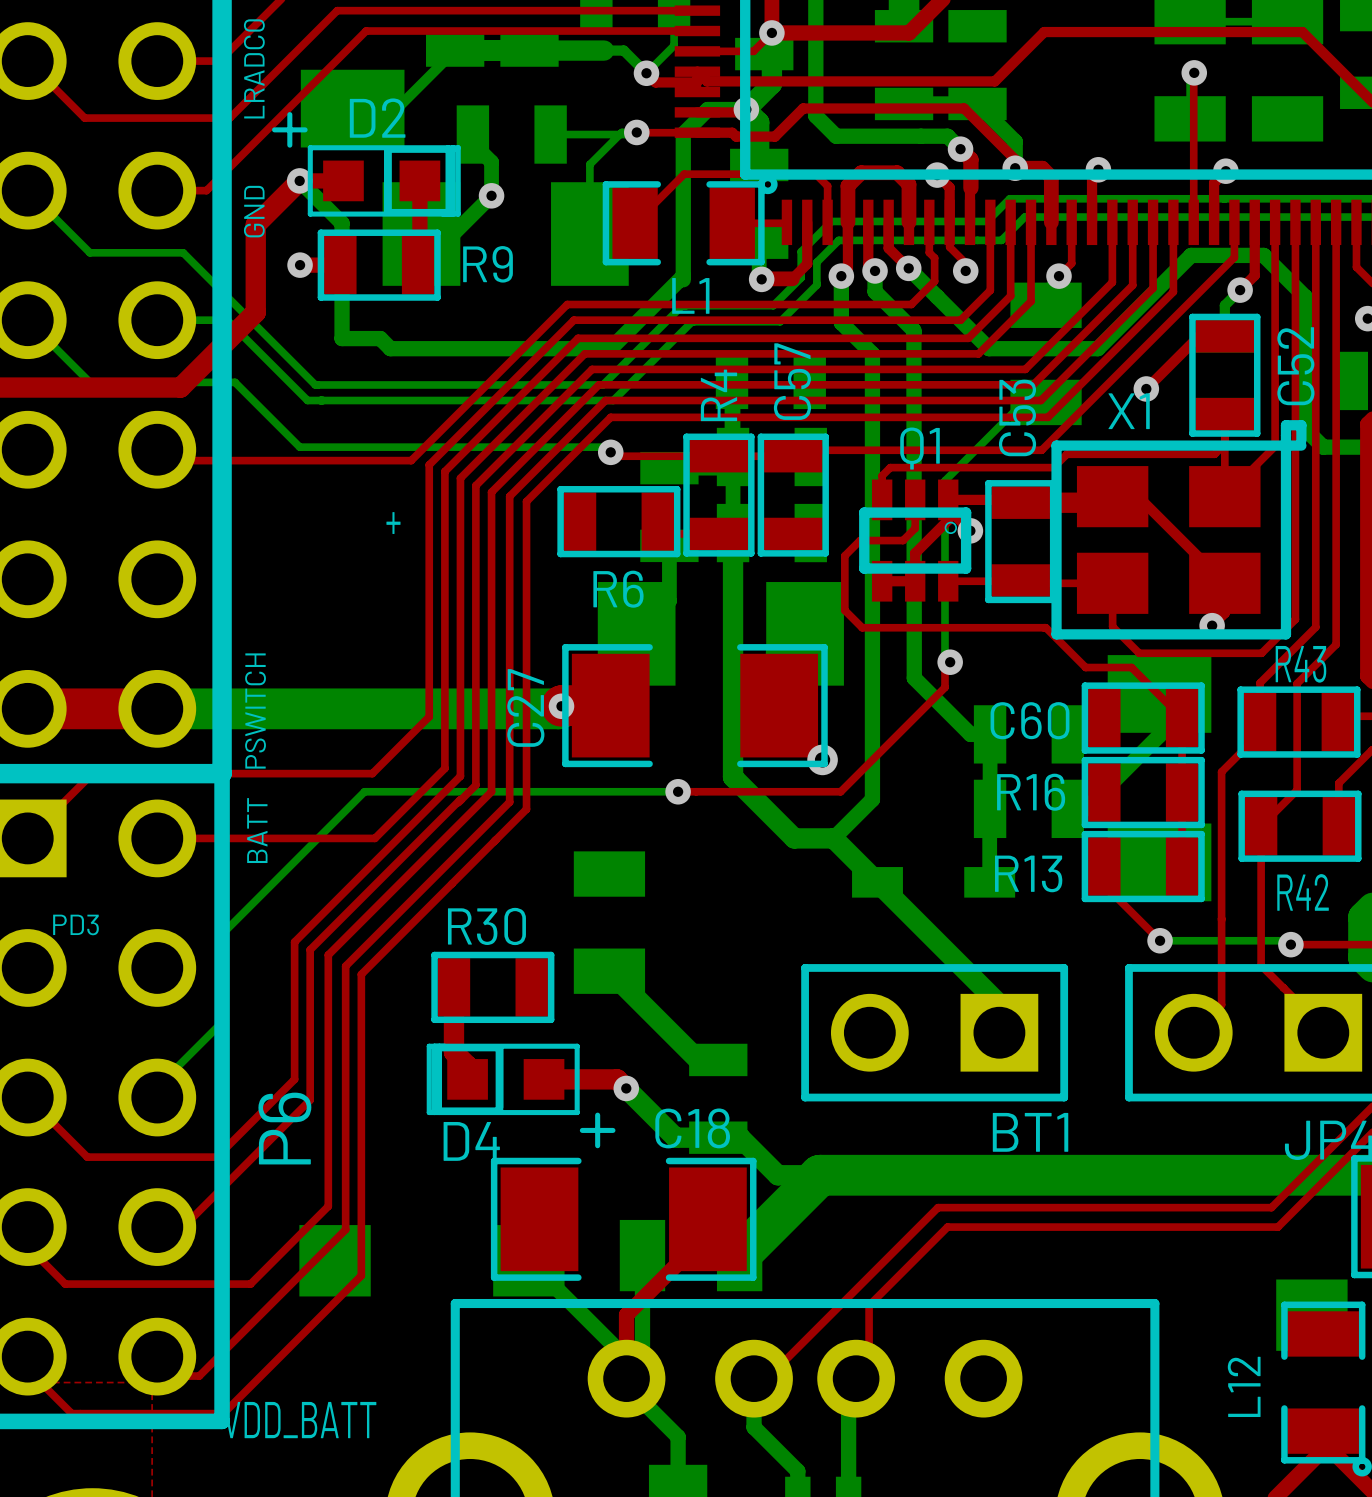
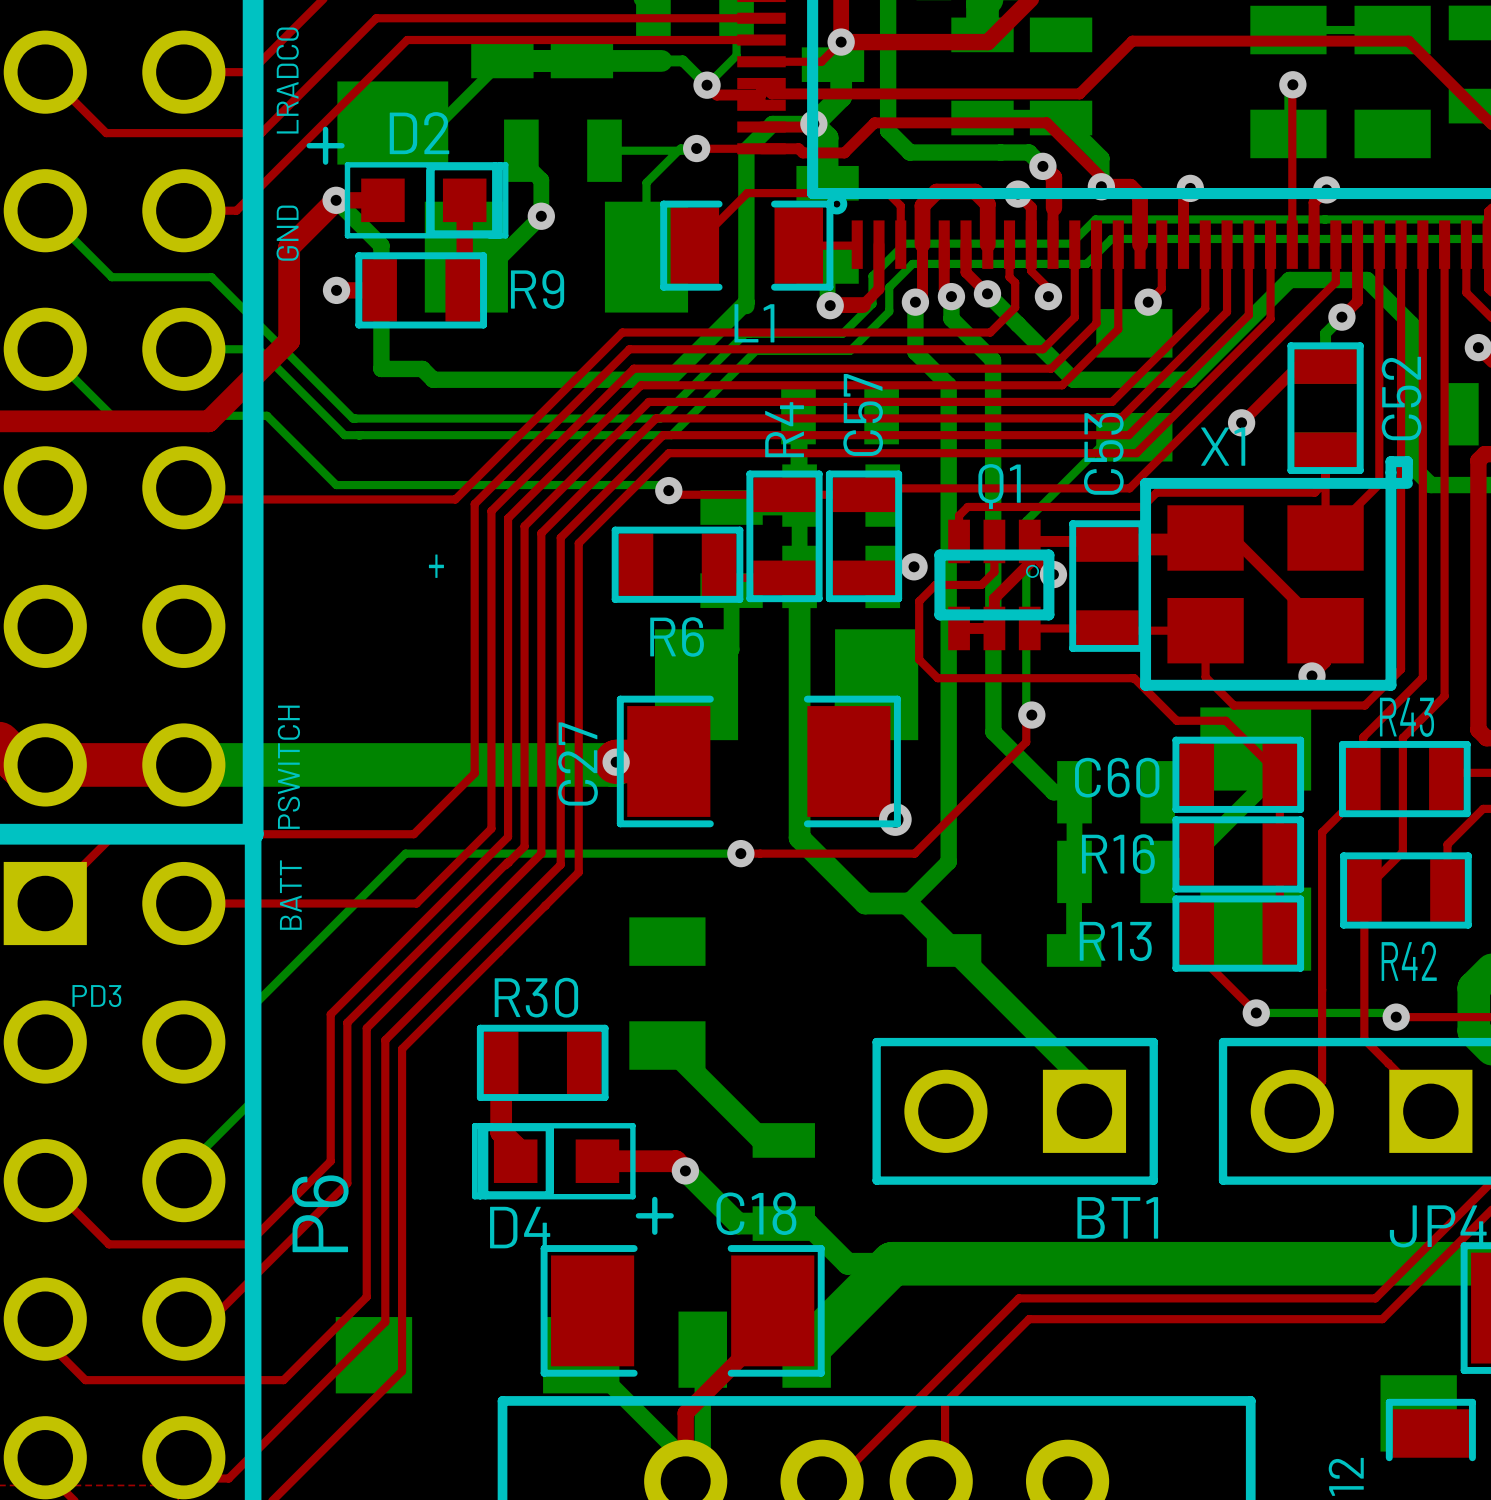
via: none -> (914, 566)

